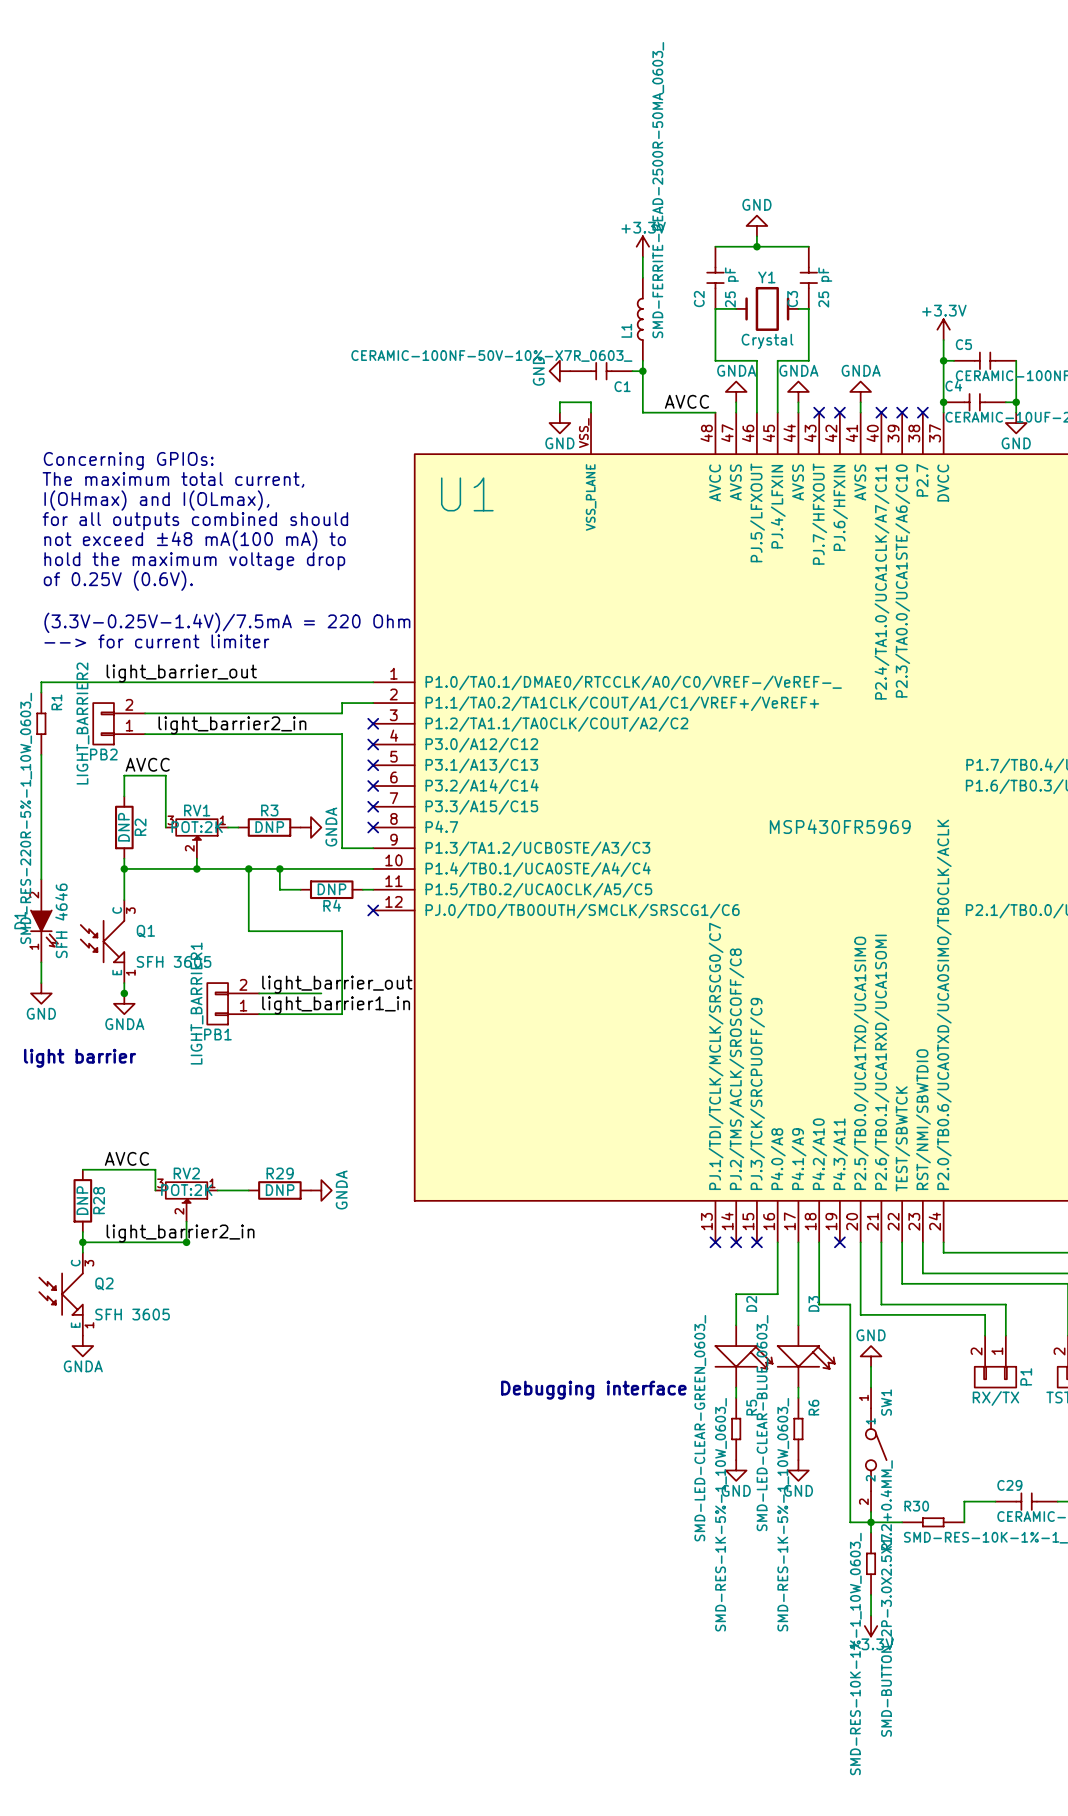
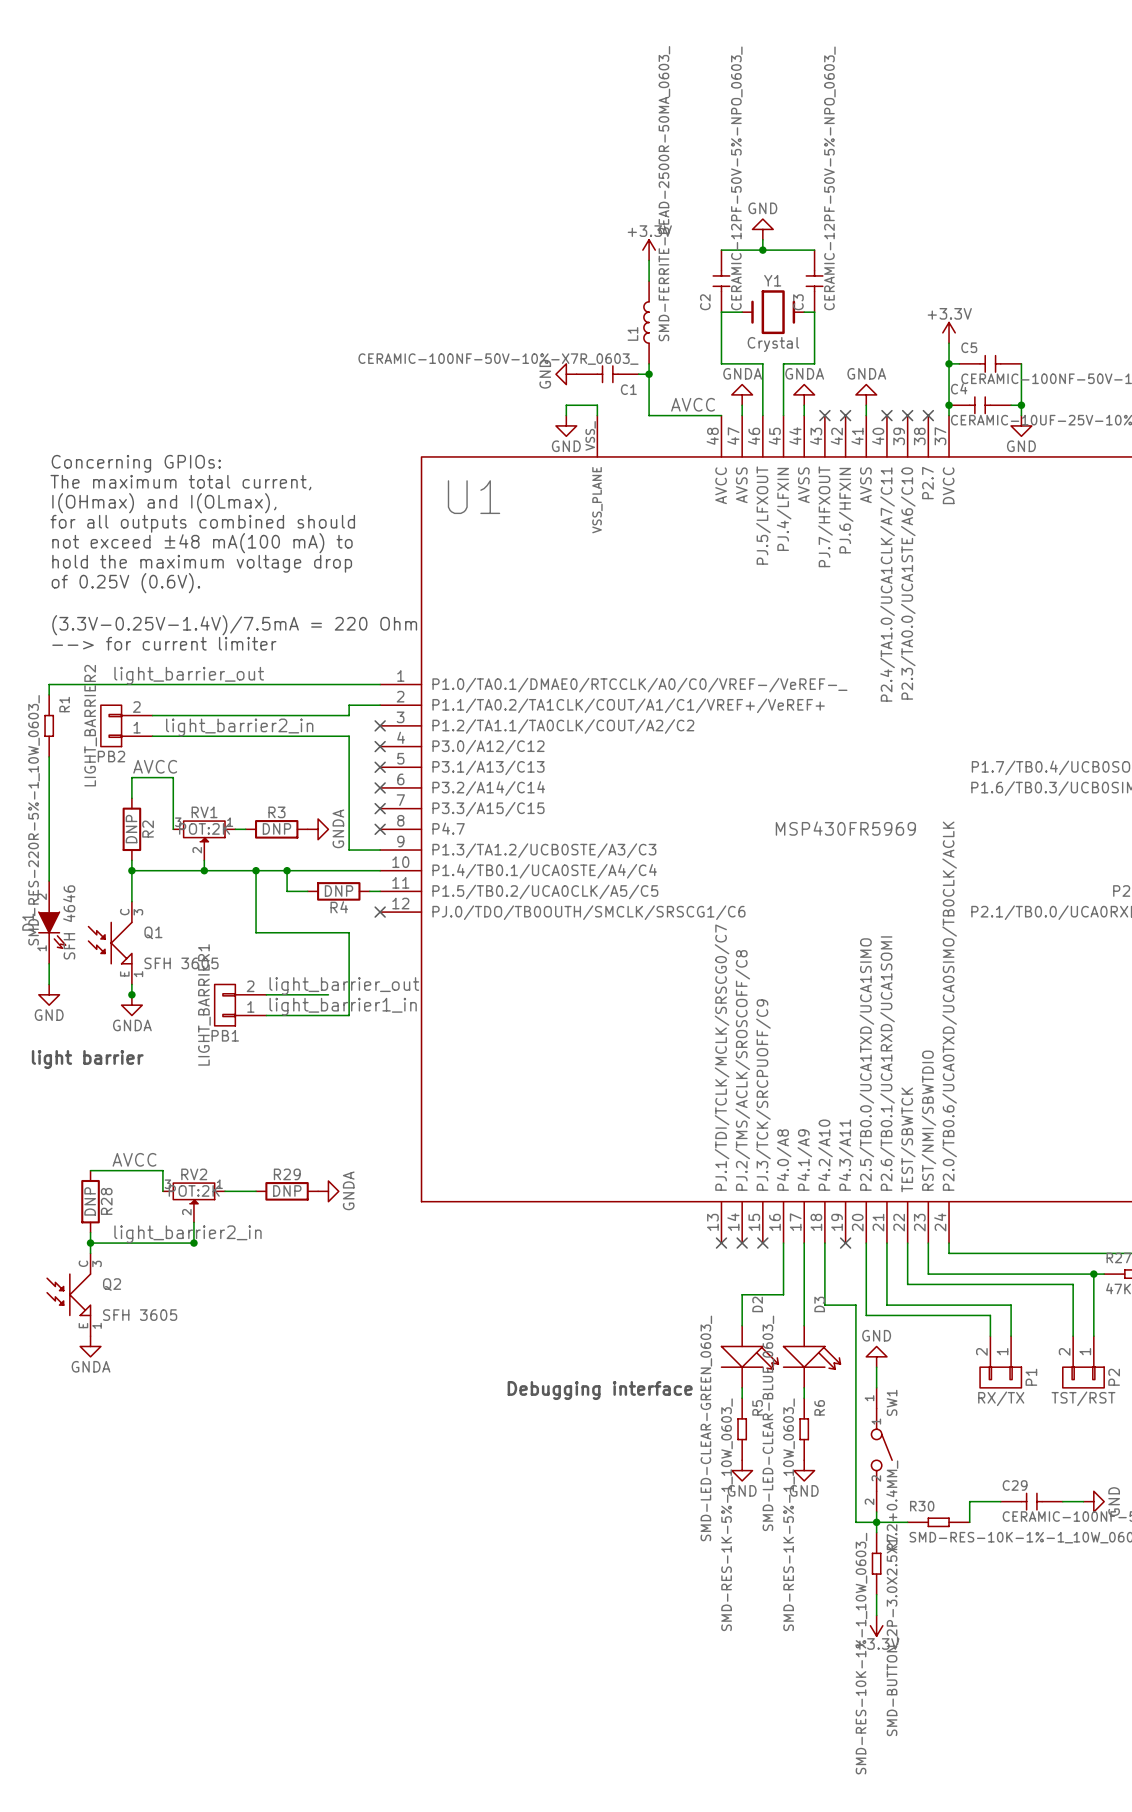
C2 value: 25 pF (731, 287) -> CERAMIC-12PF-50V-5%-NPO_0603_ (736, 178)
C3 value: 25 pF (825, 287) -> CERAMIC-12PF-50V-5%-NPO_0603_ (829, 178)

